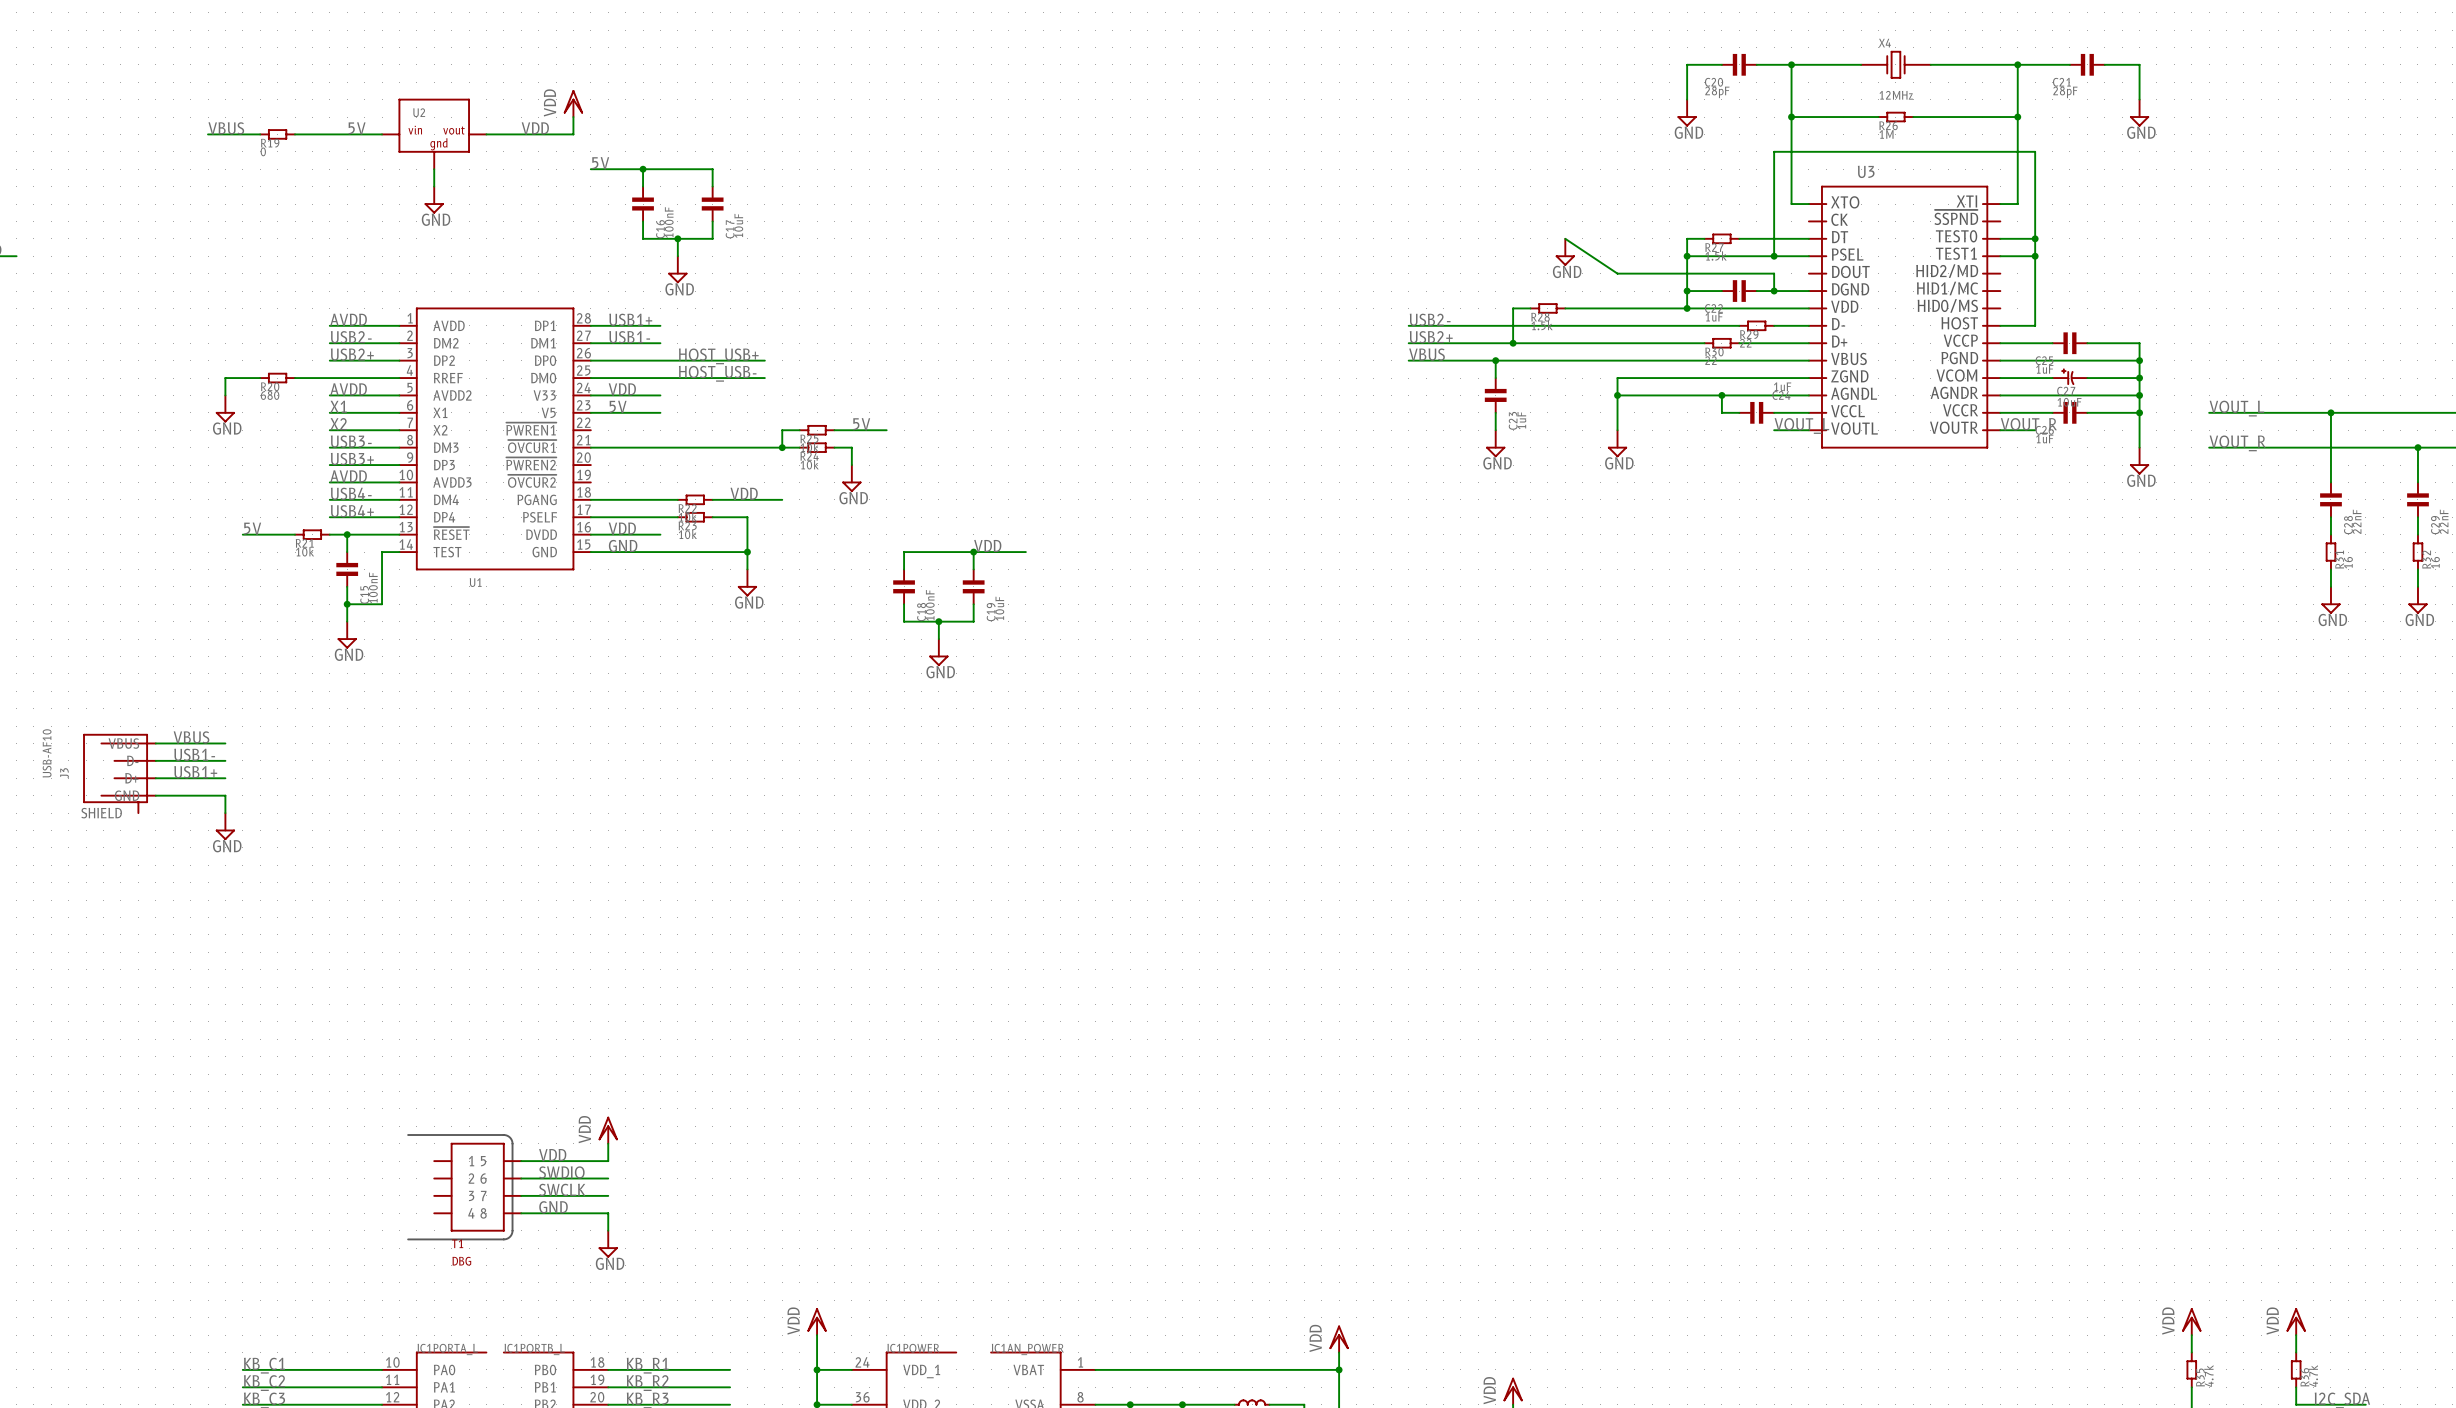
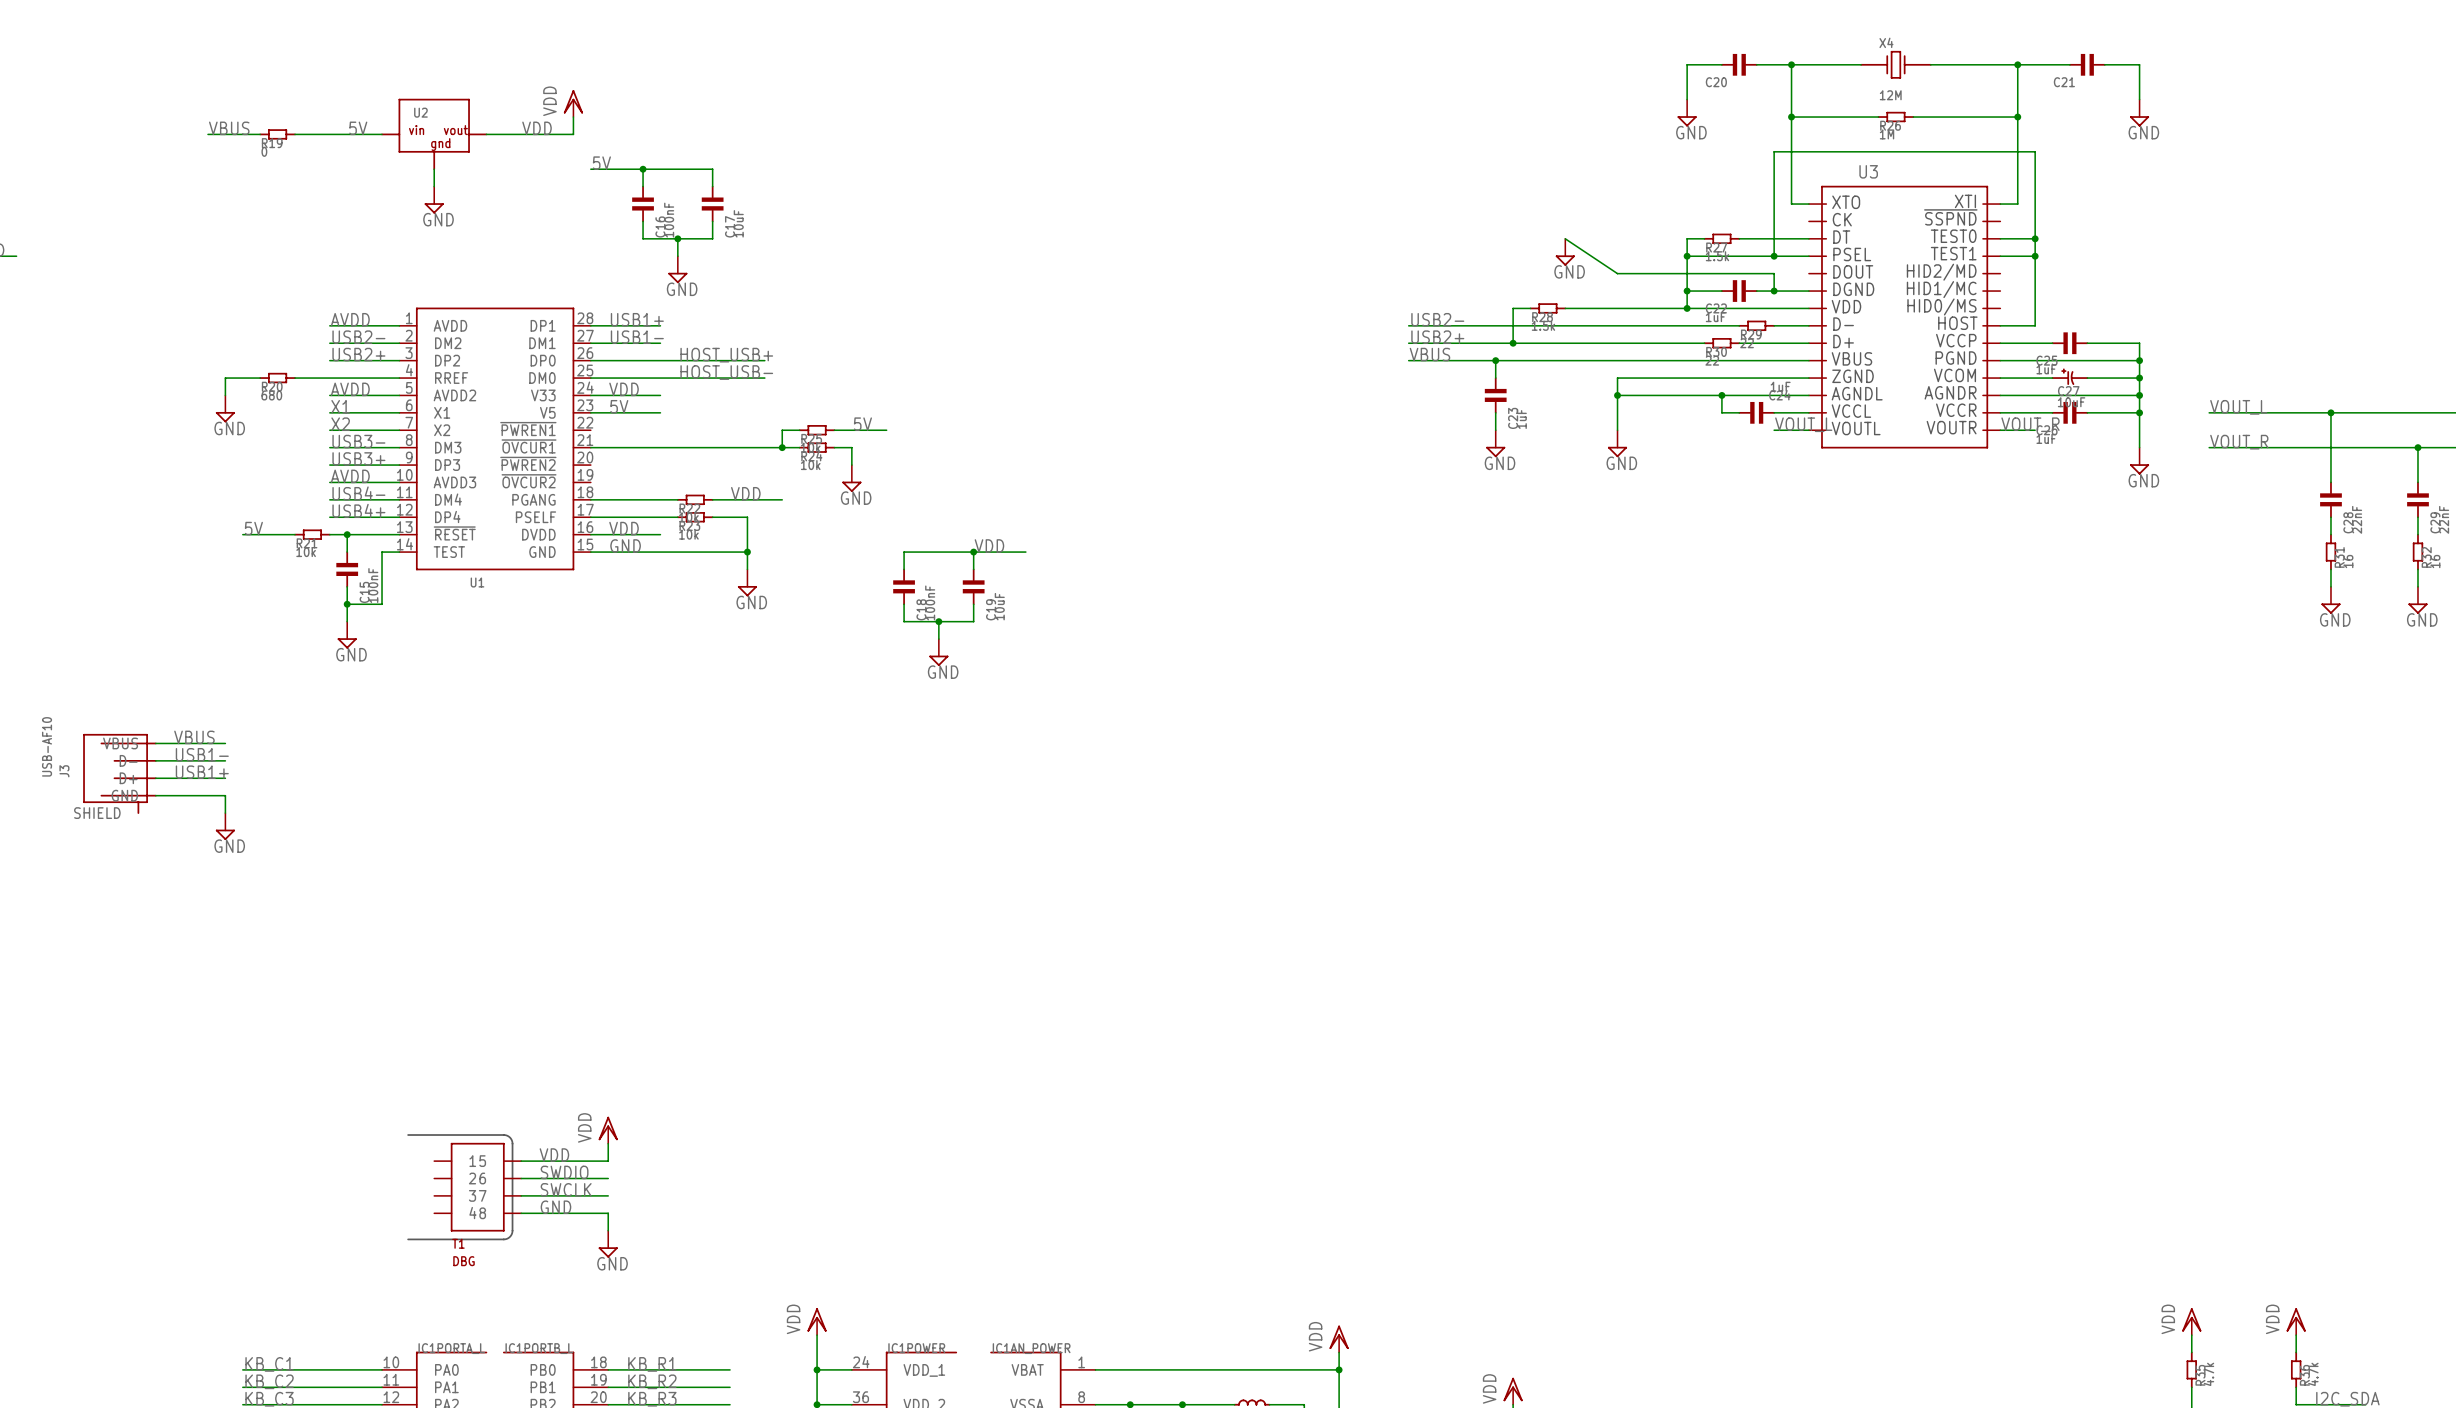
C20 value: 28pF (1717, 92) -> none
C21 value: 28pF (2065, 92) -> none
X4 value: 12MHz (1896, 95) -> 12M (1890, 95)

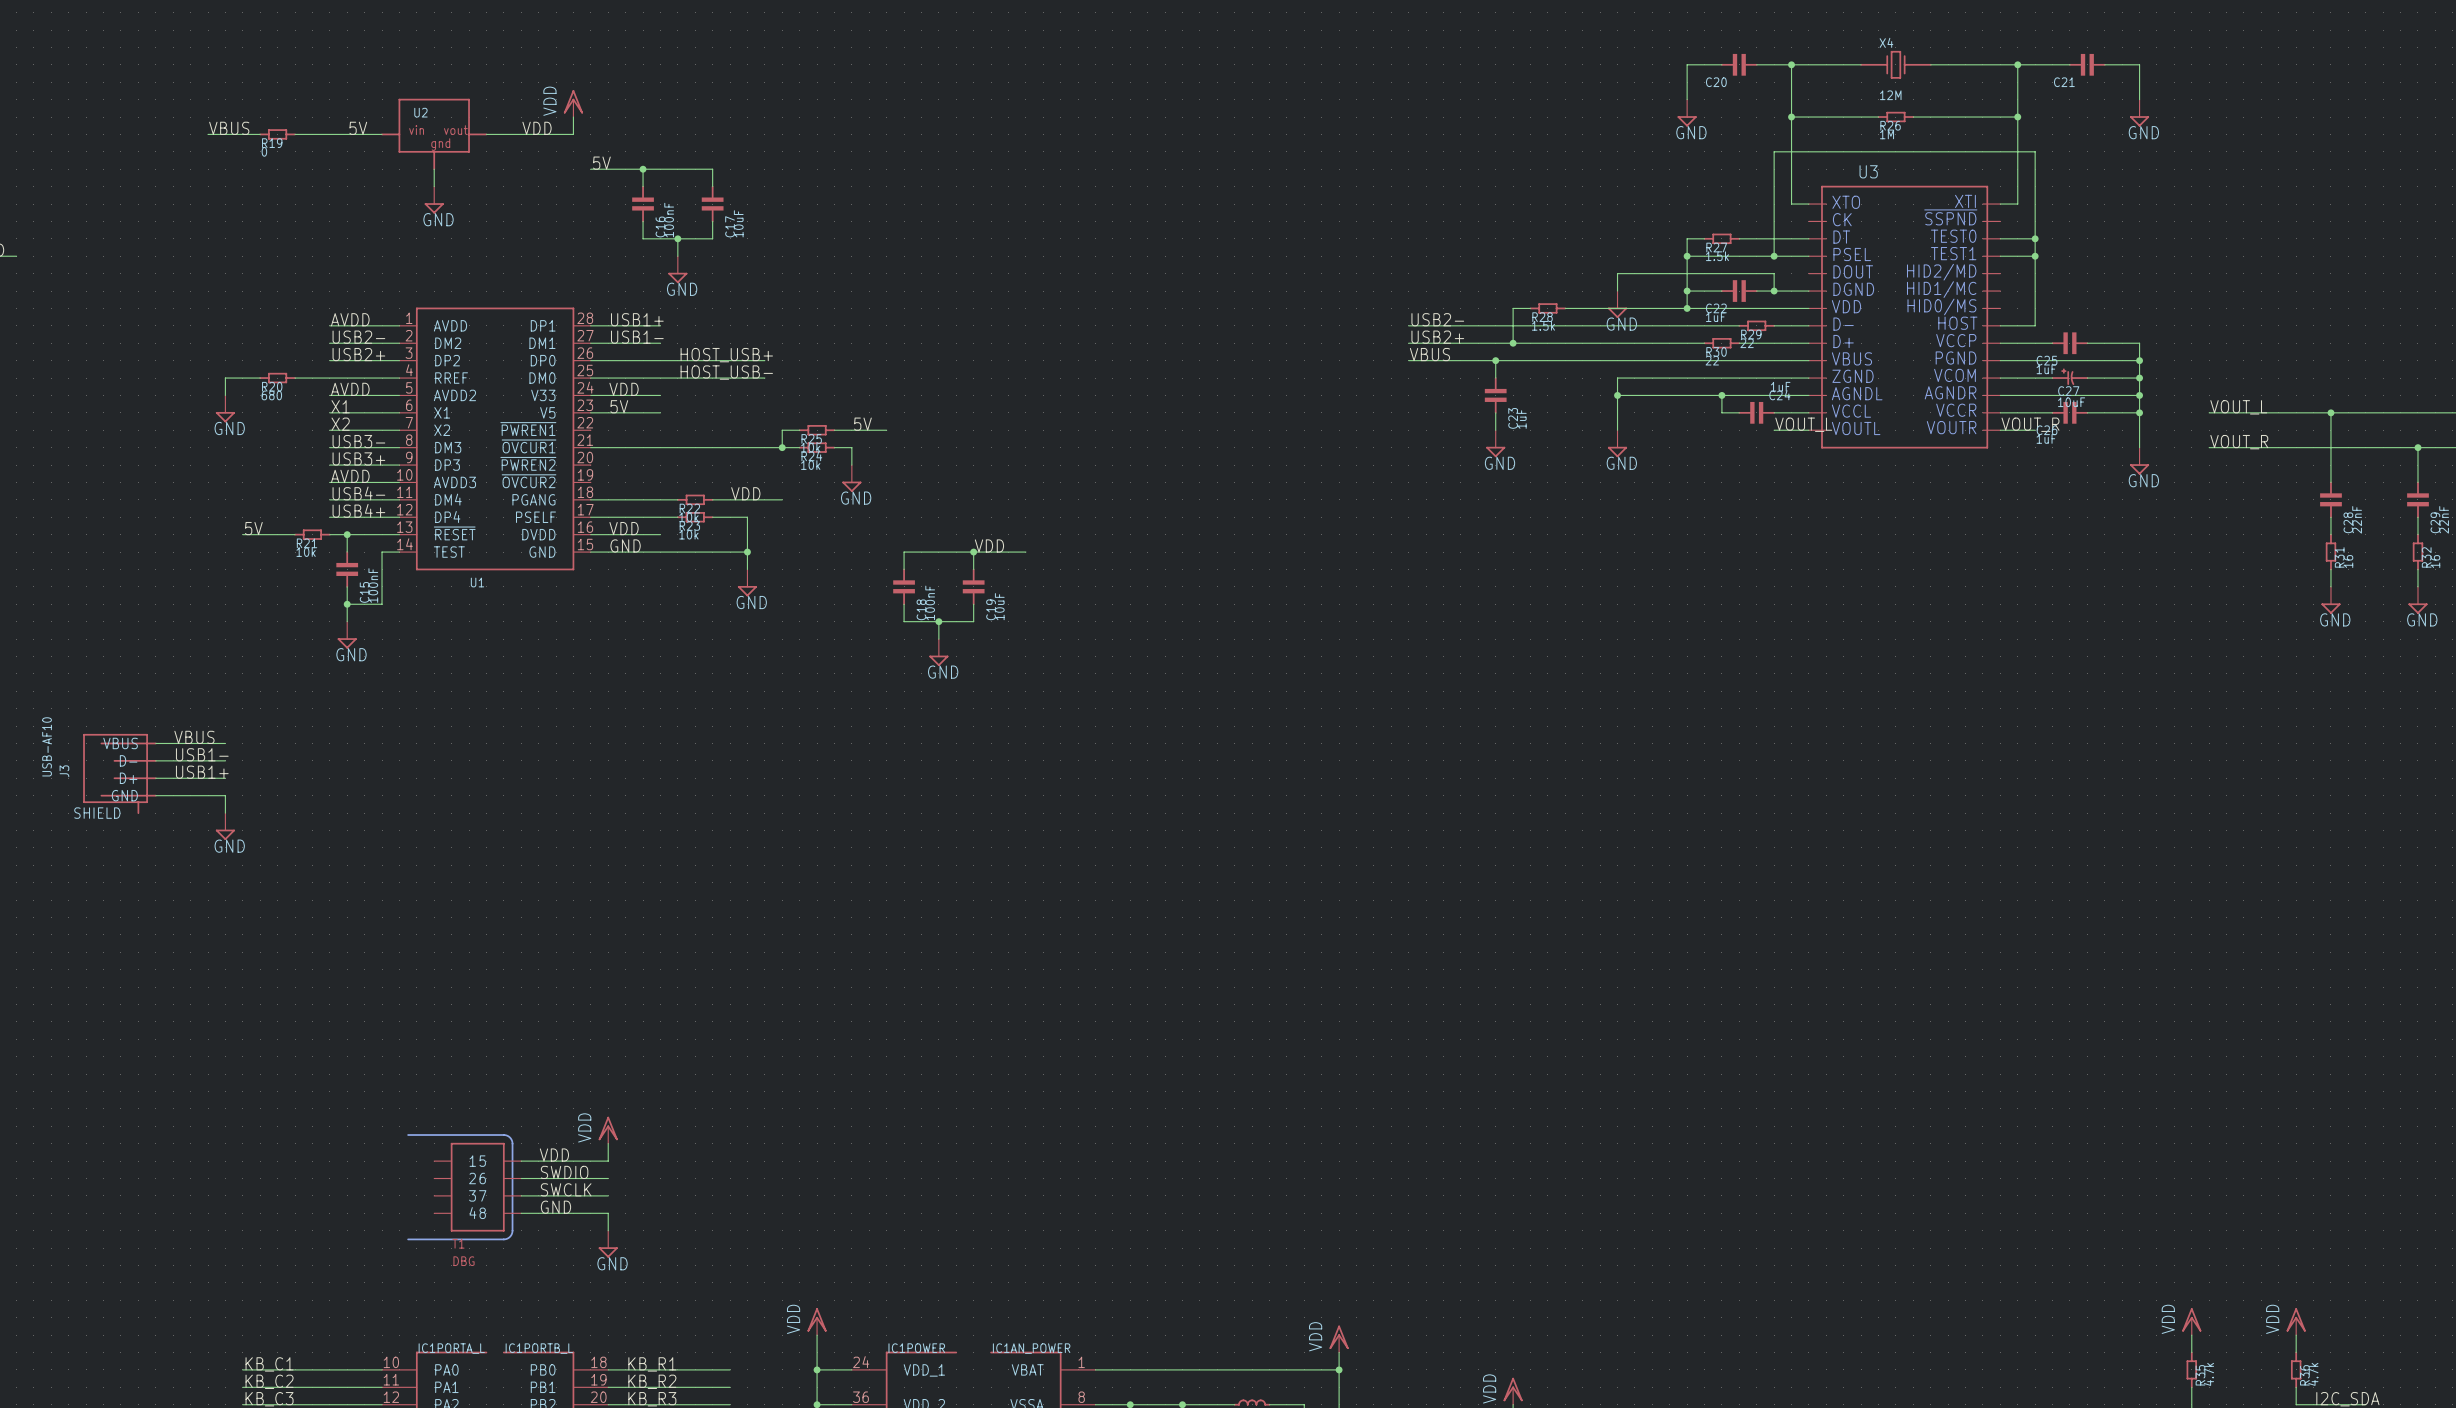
wire: (1565, 238) (1617, 273) -> (1617, 291) (1617, 273)
power symbol position: GND (1565, 252) -> GND (1617, 304)

